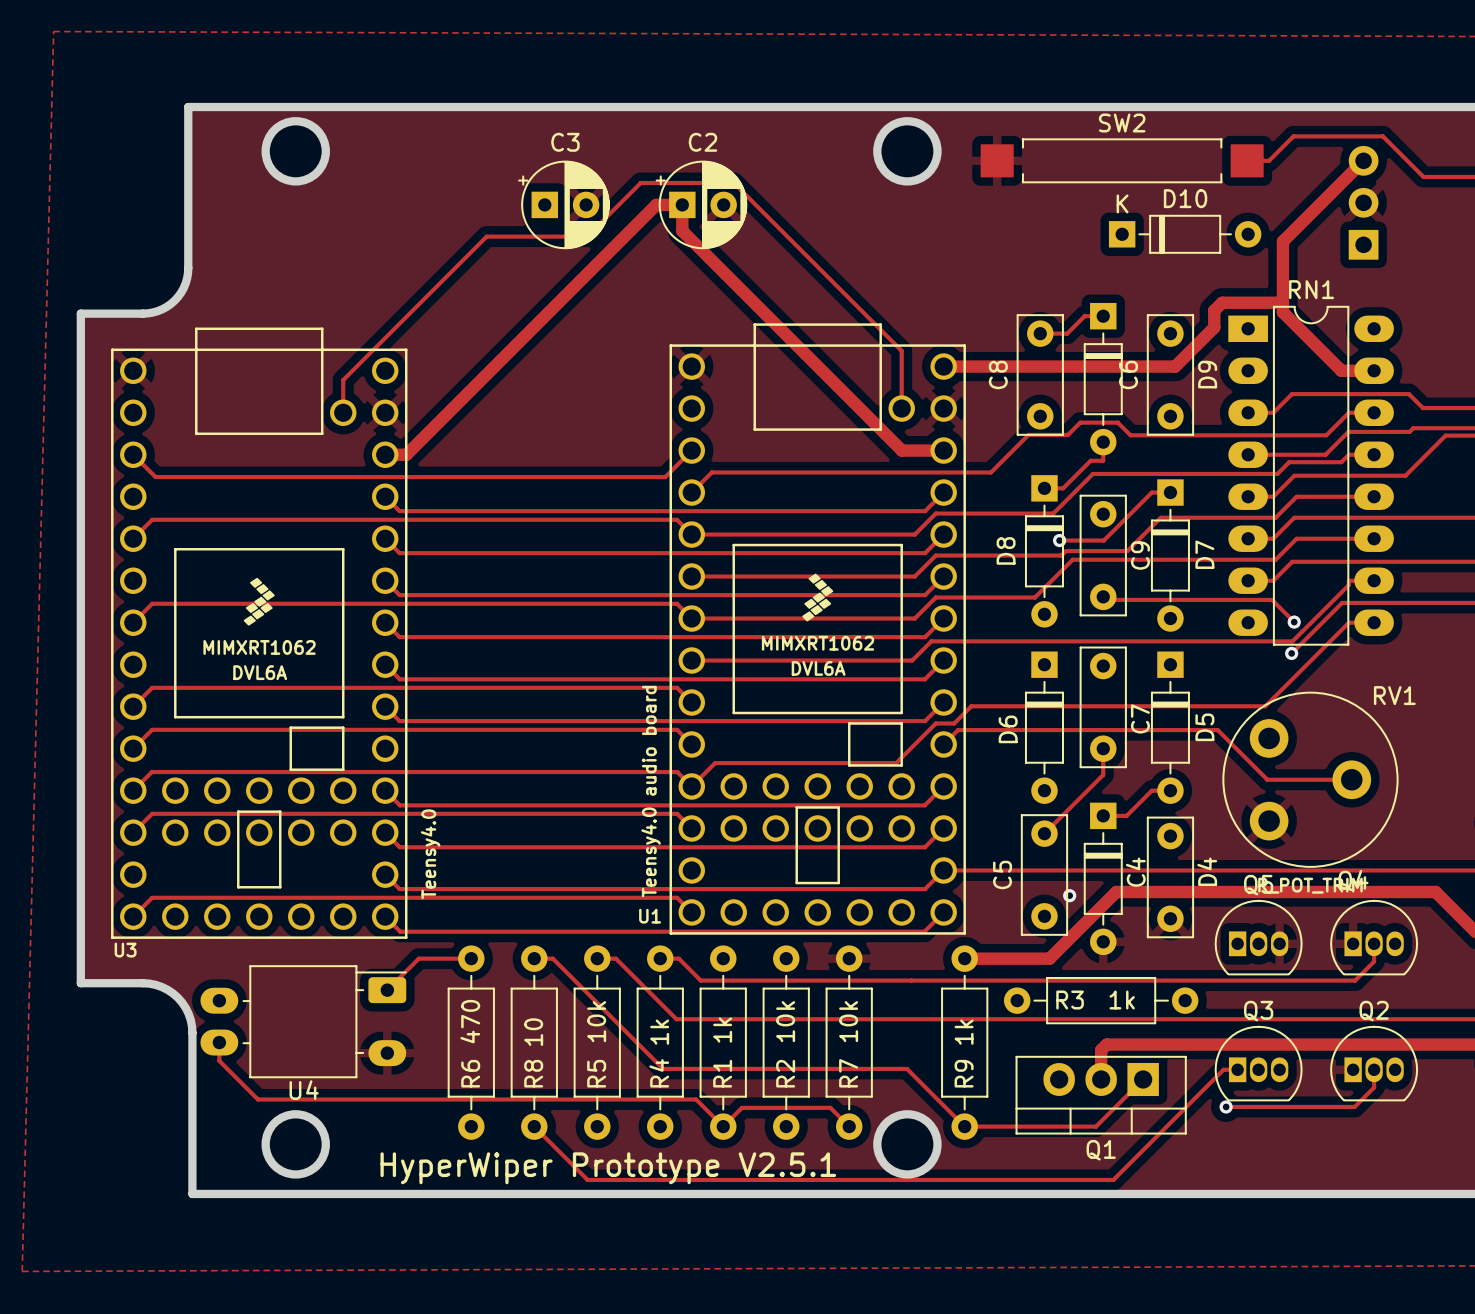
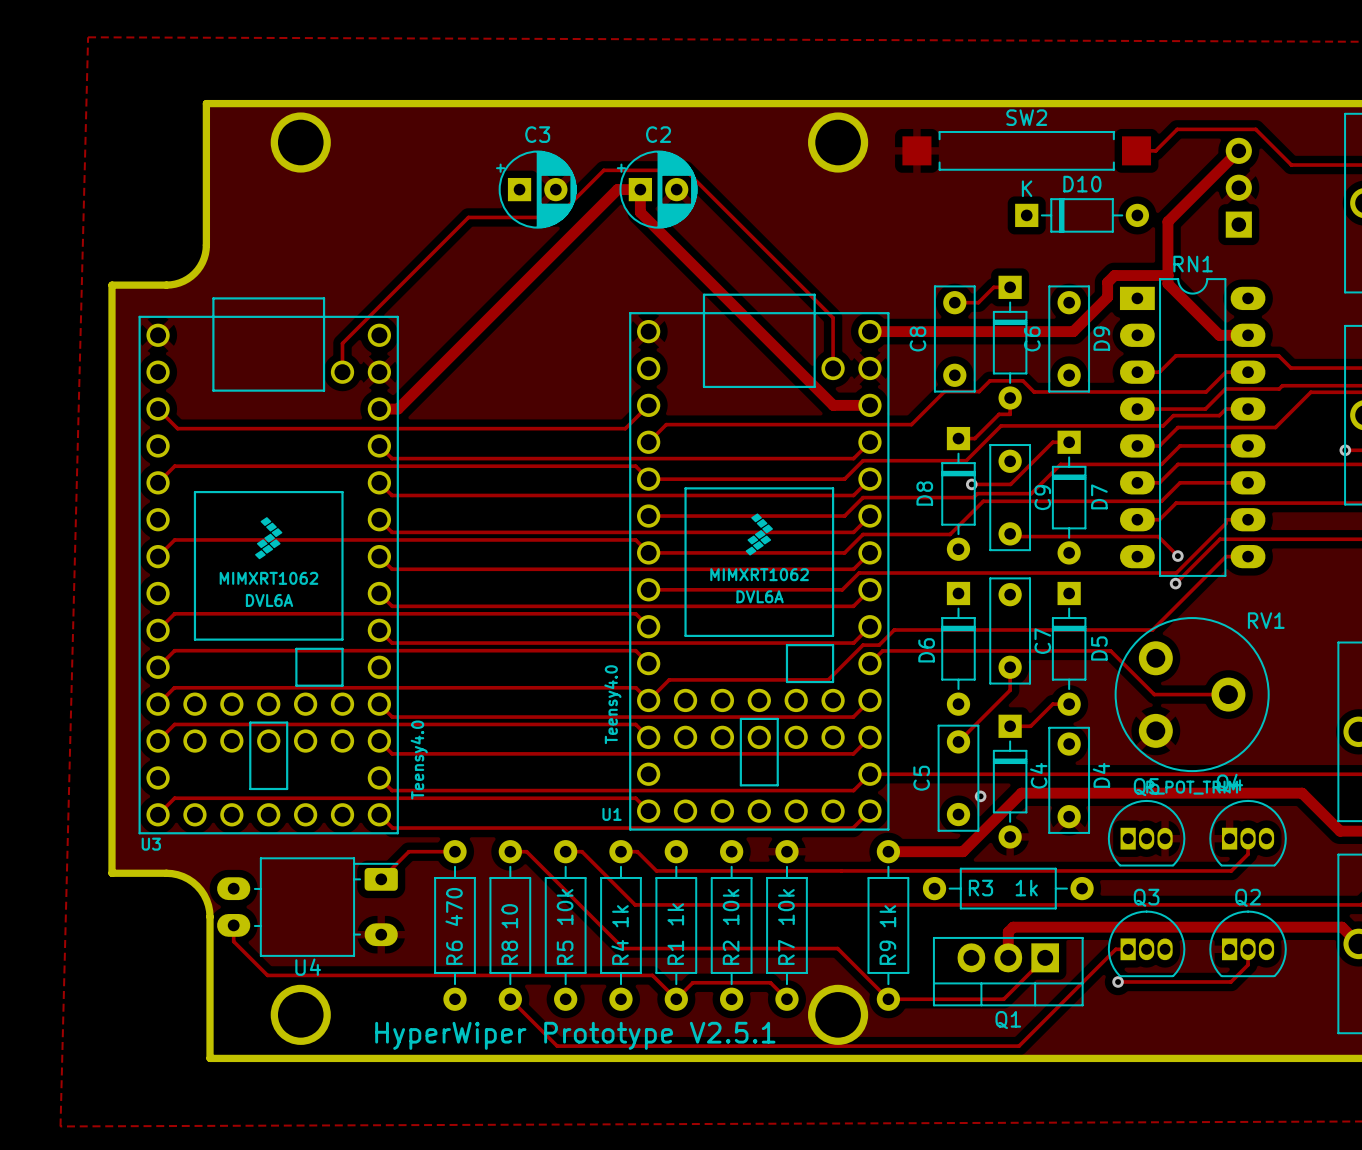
U1 value: Teensy4.0 audio board (651, 791) -> Teensy4.0 (612, 704)

